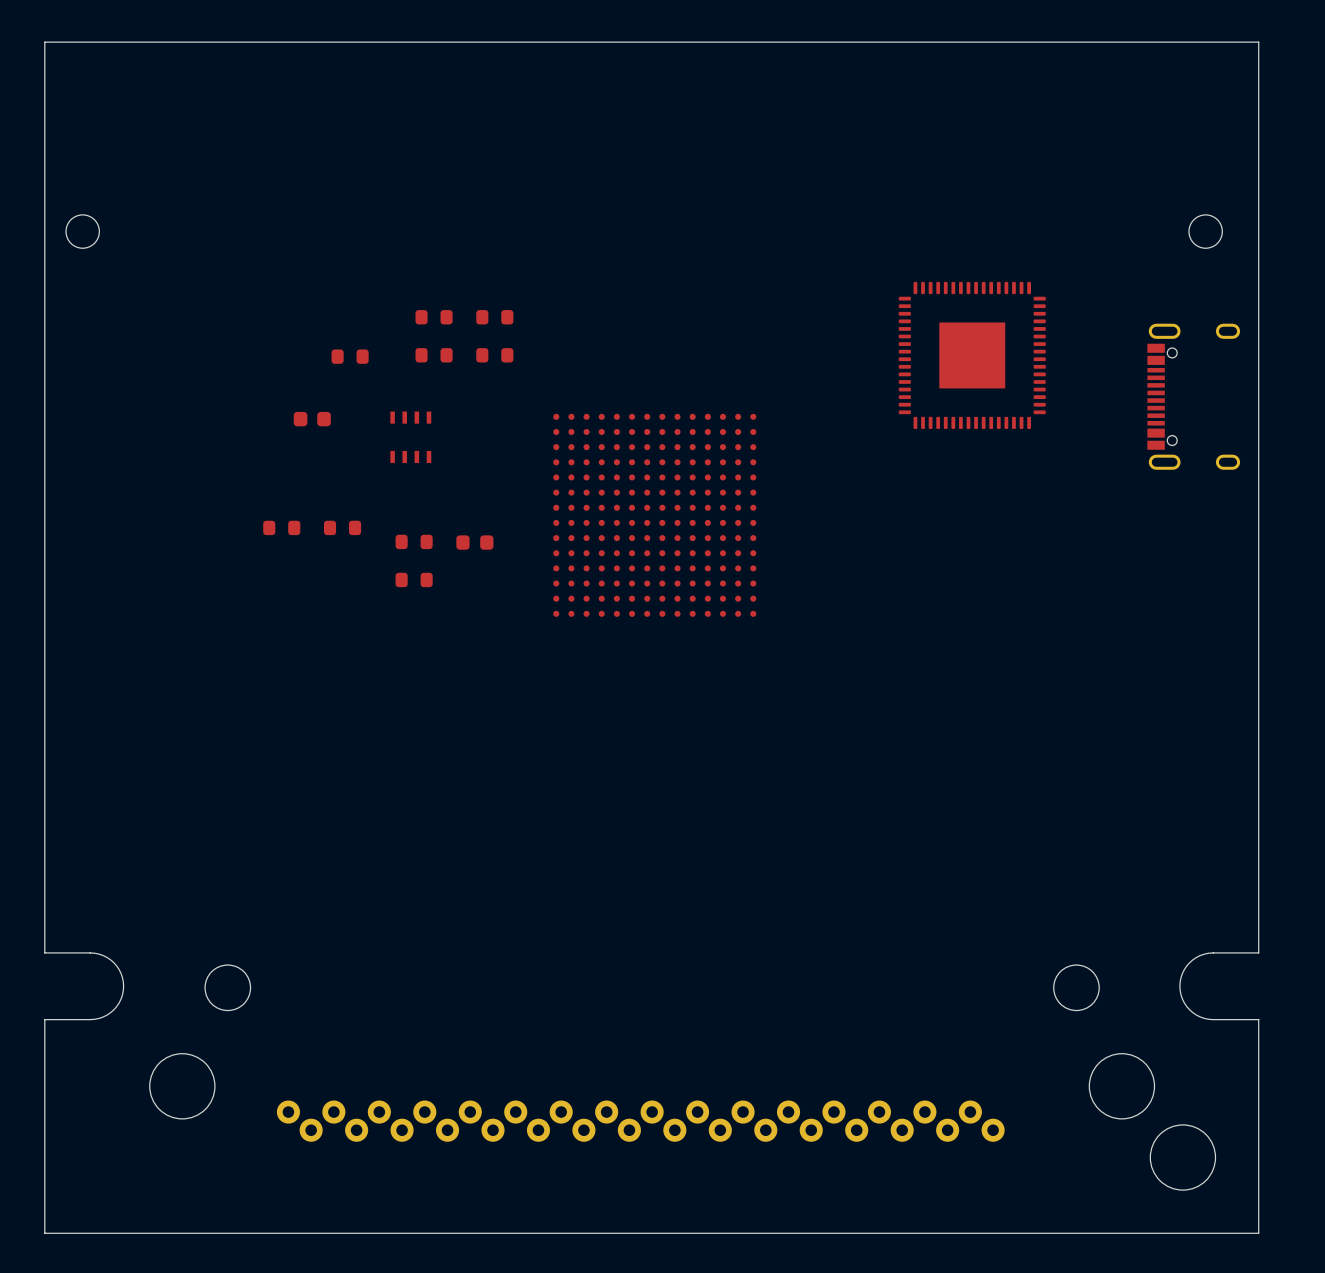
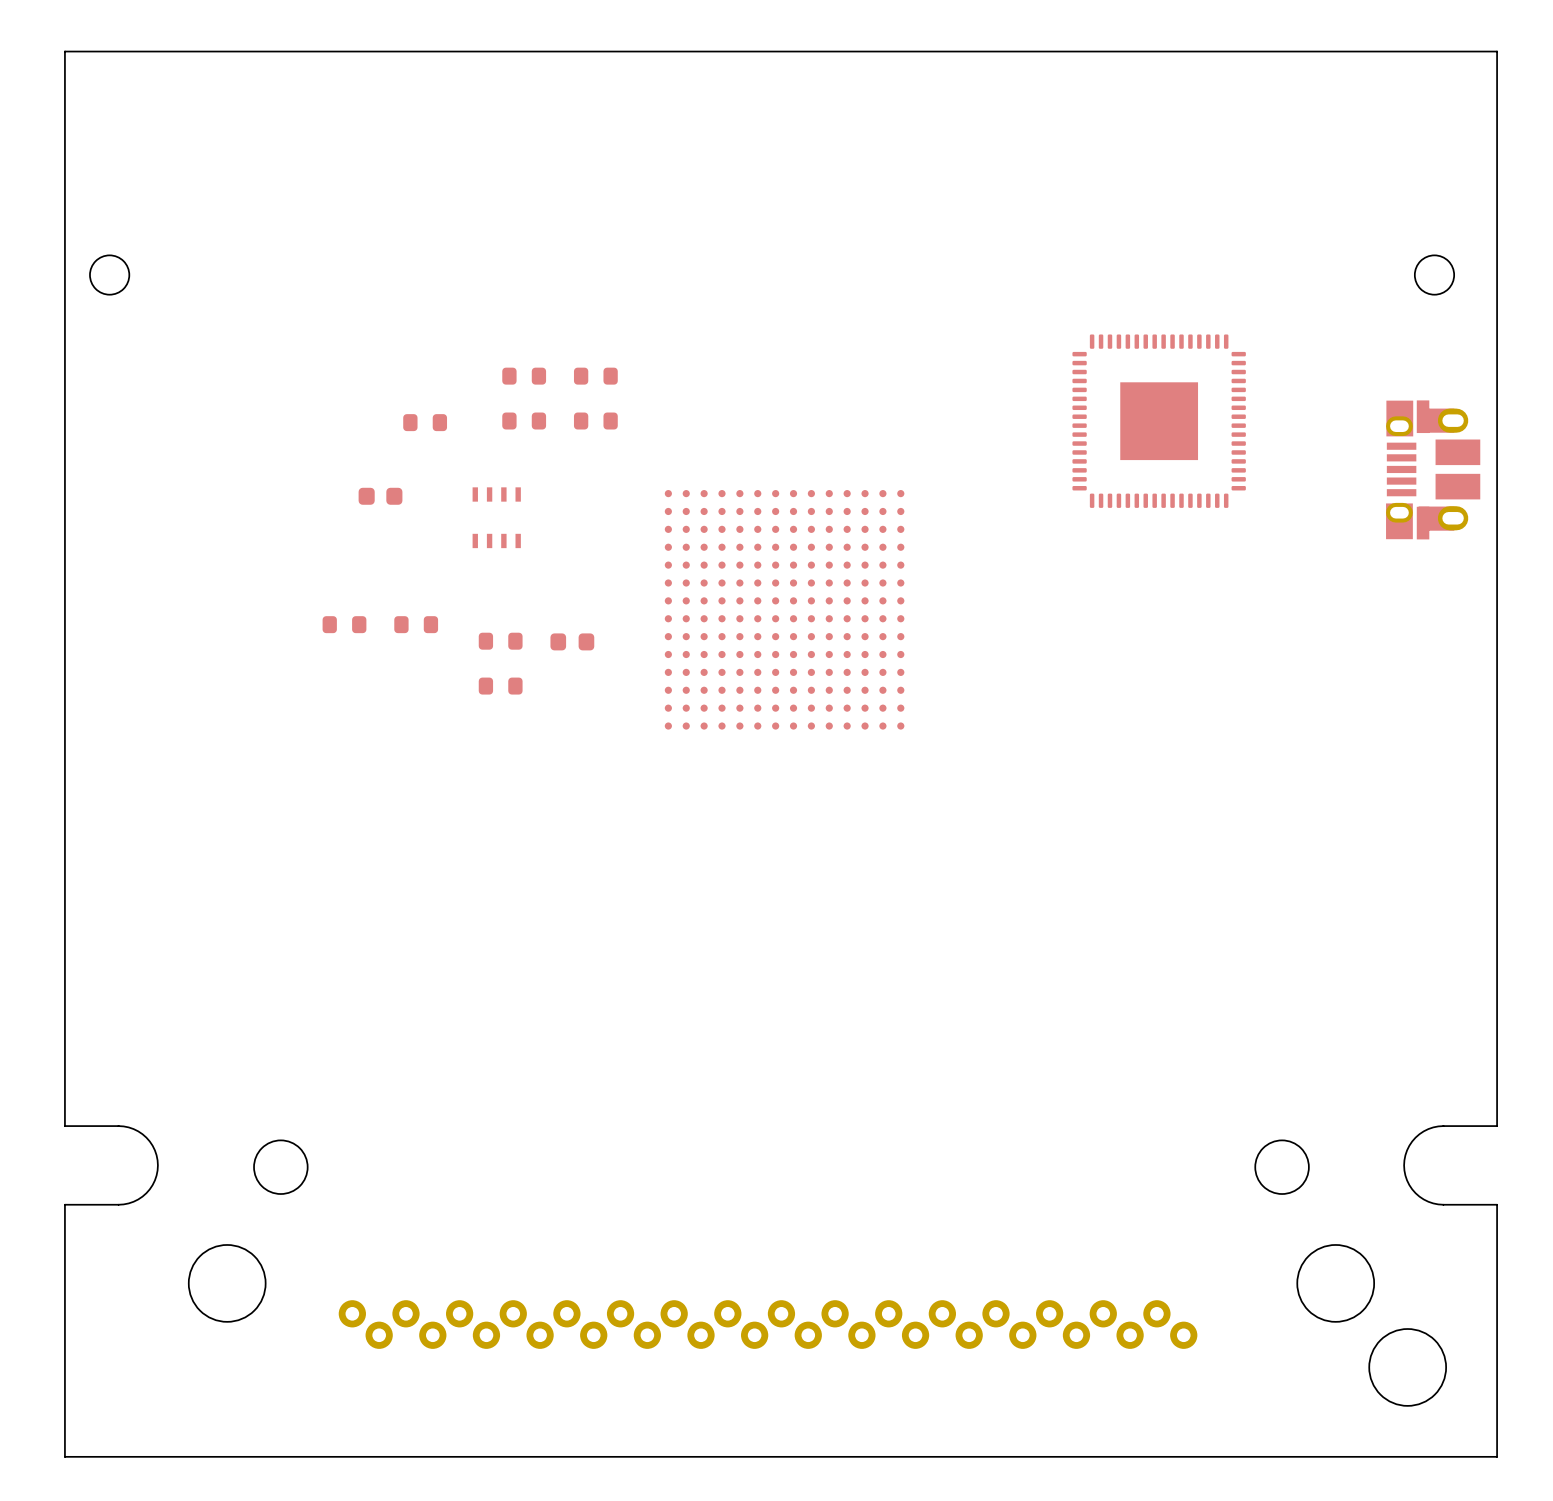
part footprint: [1147, 323, 1241, 470] -> [1386, 400, 1481, 540]

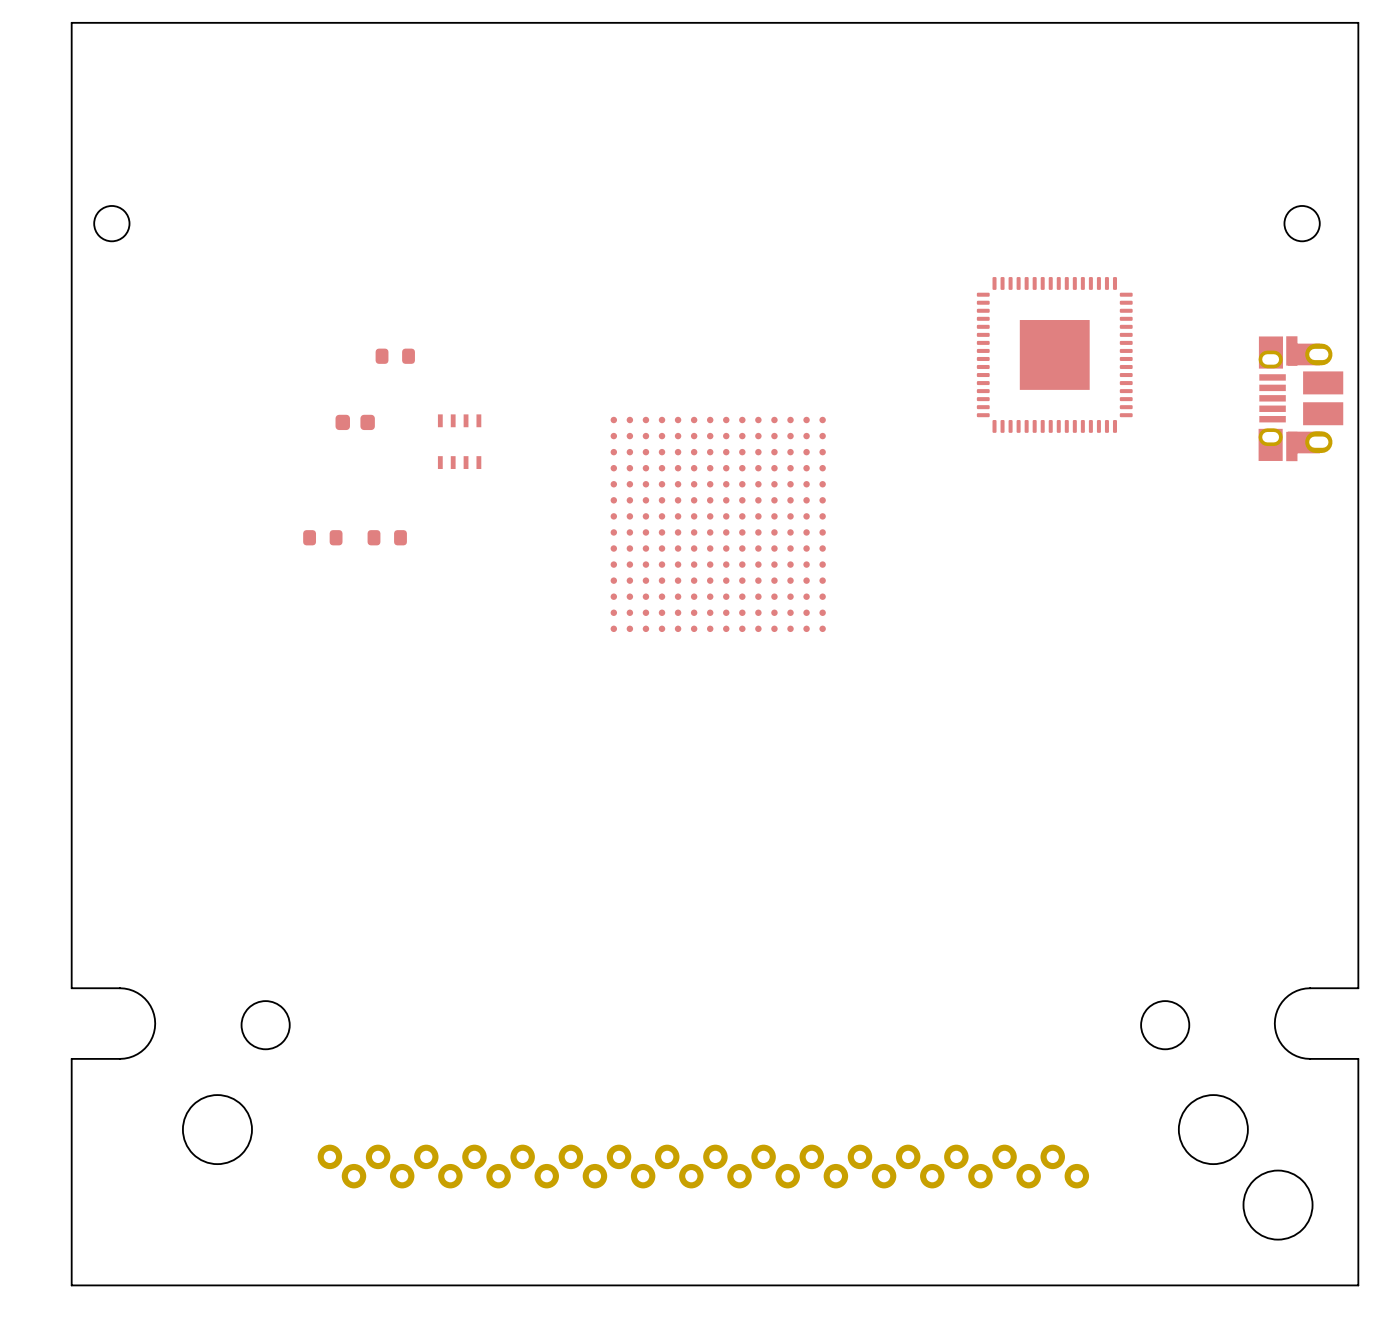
part: (524, 376) -> none
part: (595, 376) -> none
part: (524, 421) -> none
part: (595, 421) -> none
part: (500, 641) -> none
part: (572, 641) -> none
part: (500, 686) -> none

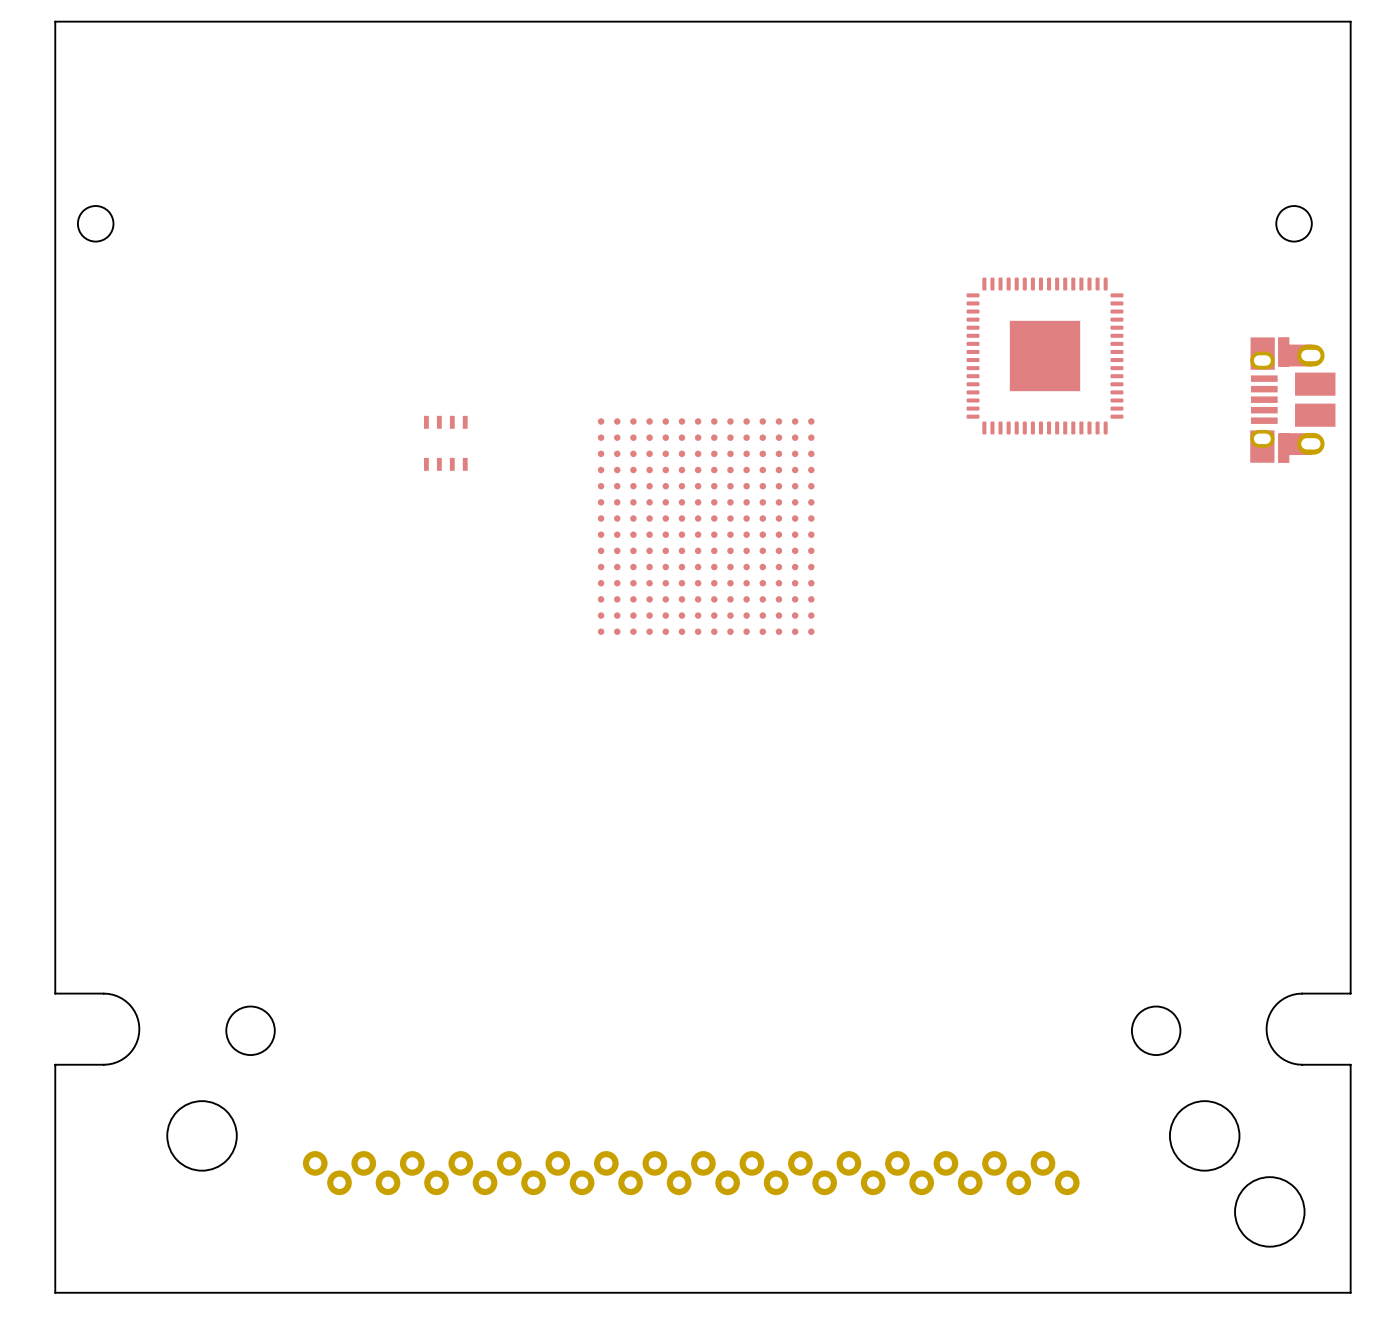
part: (395, 356) -> none
part: (355, 422) -> none
part: (322, 537) -> none
part: (387, 537) -> none

